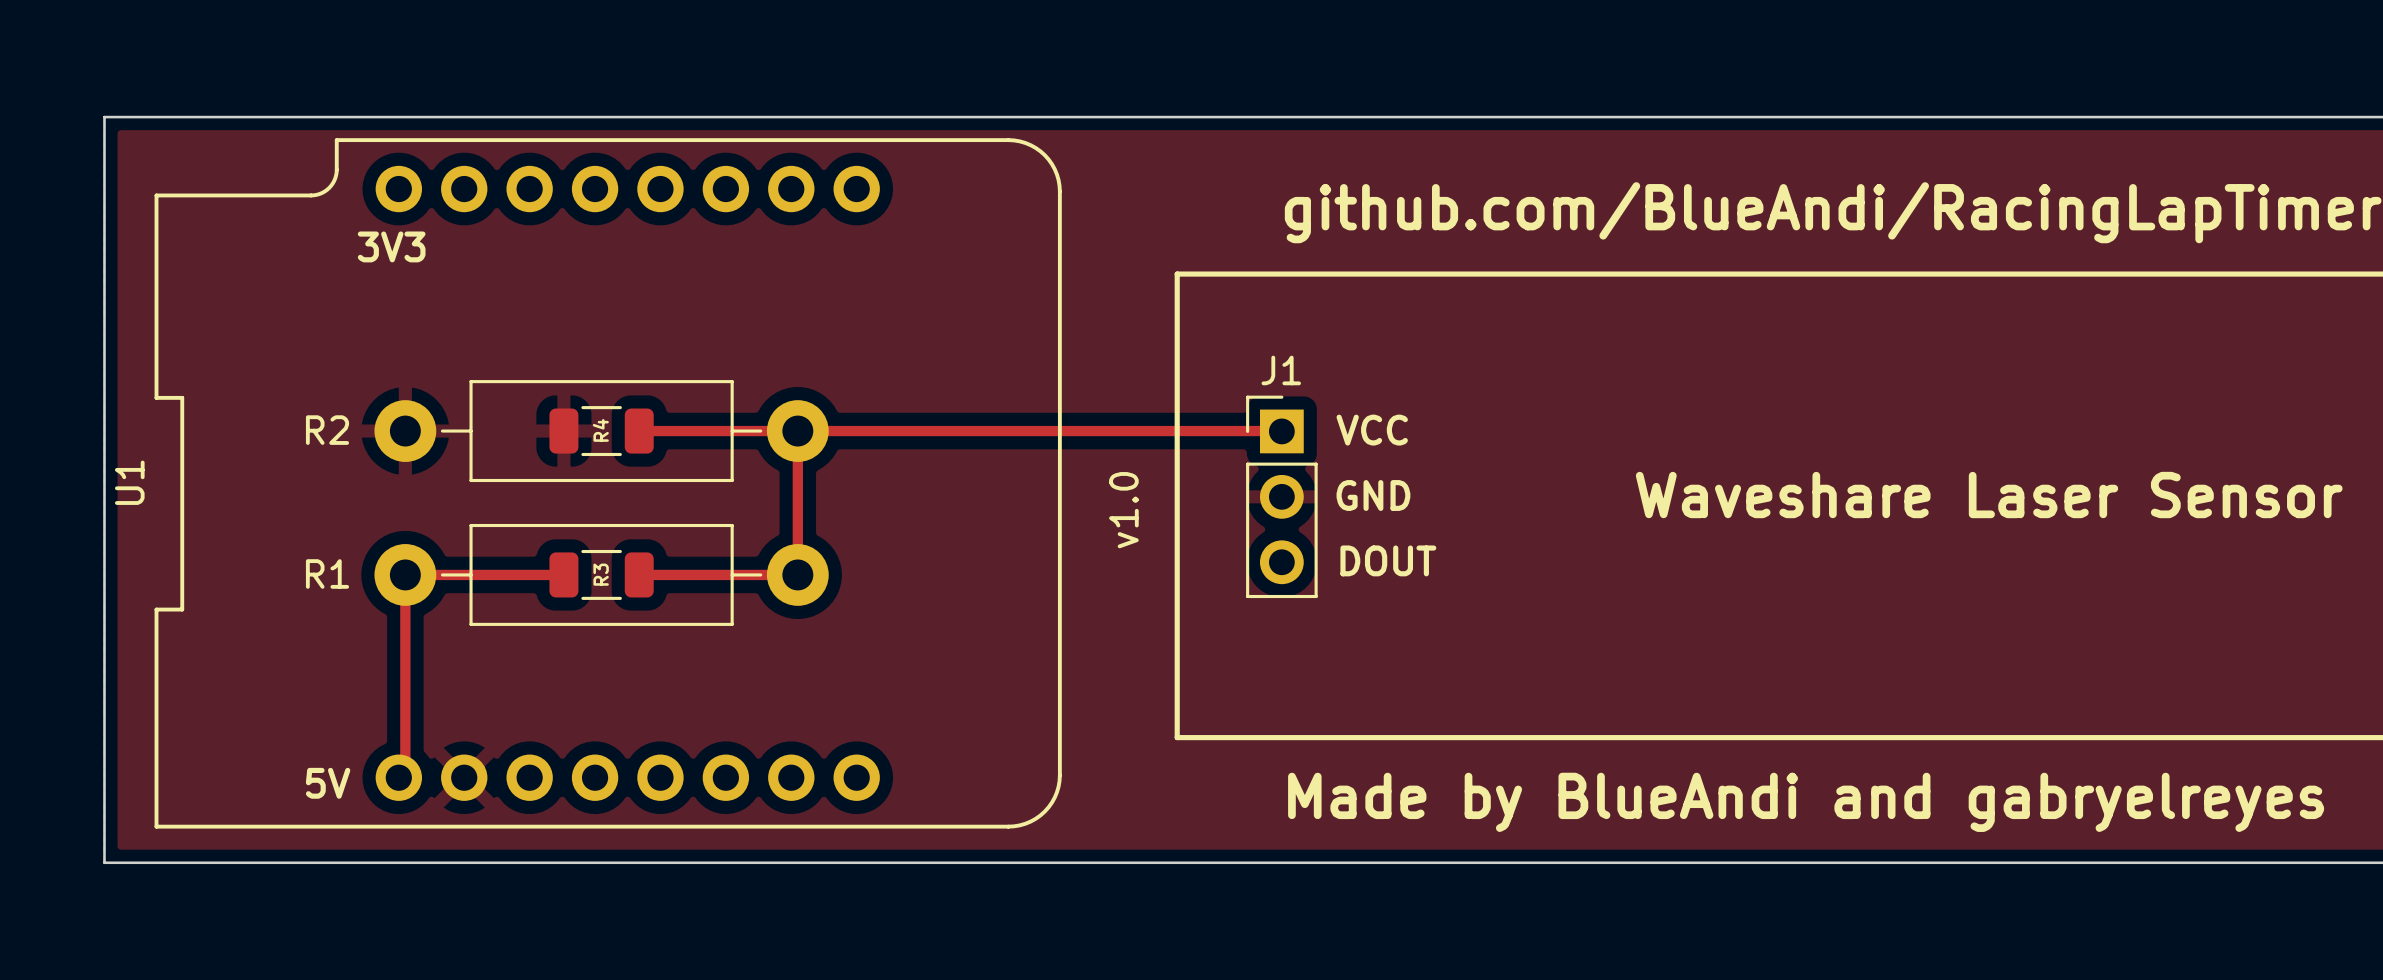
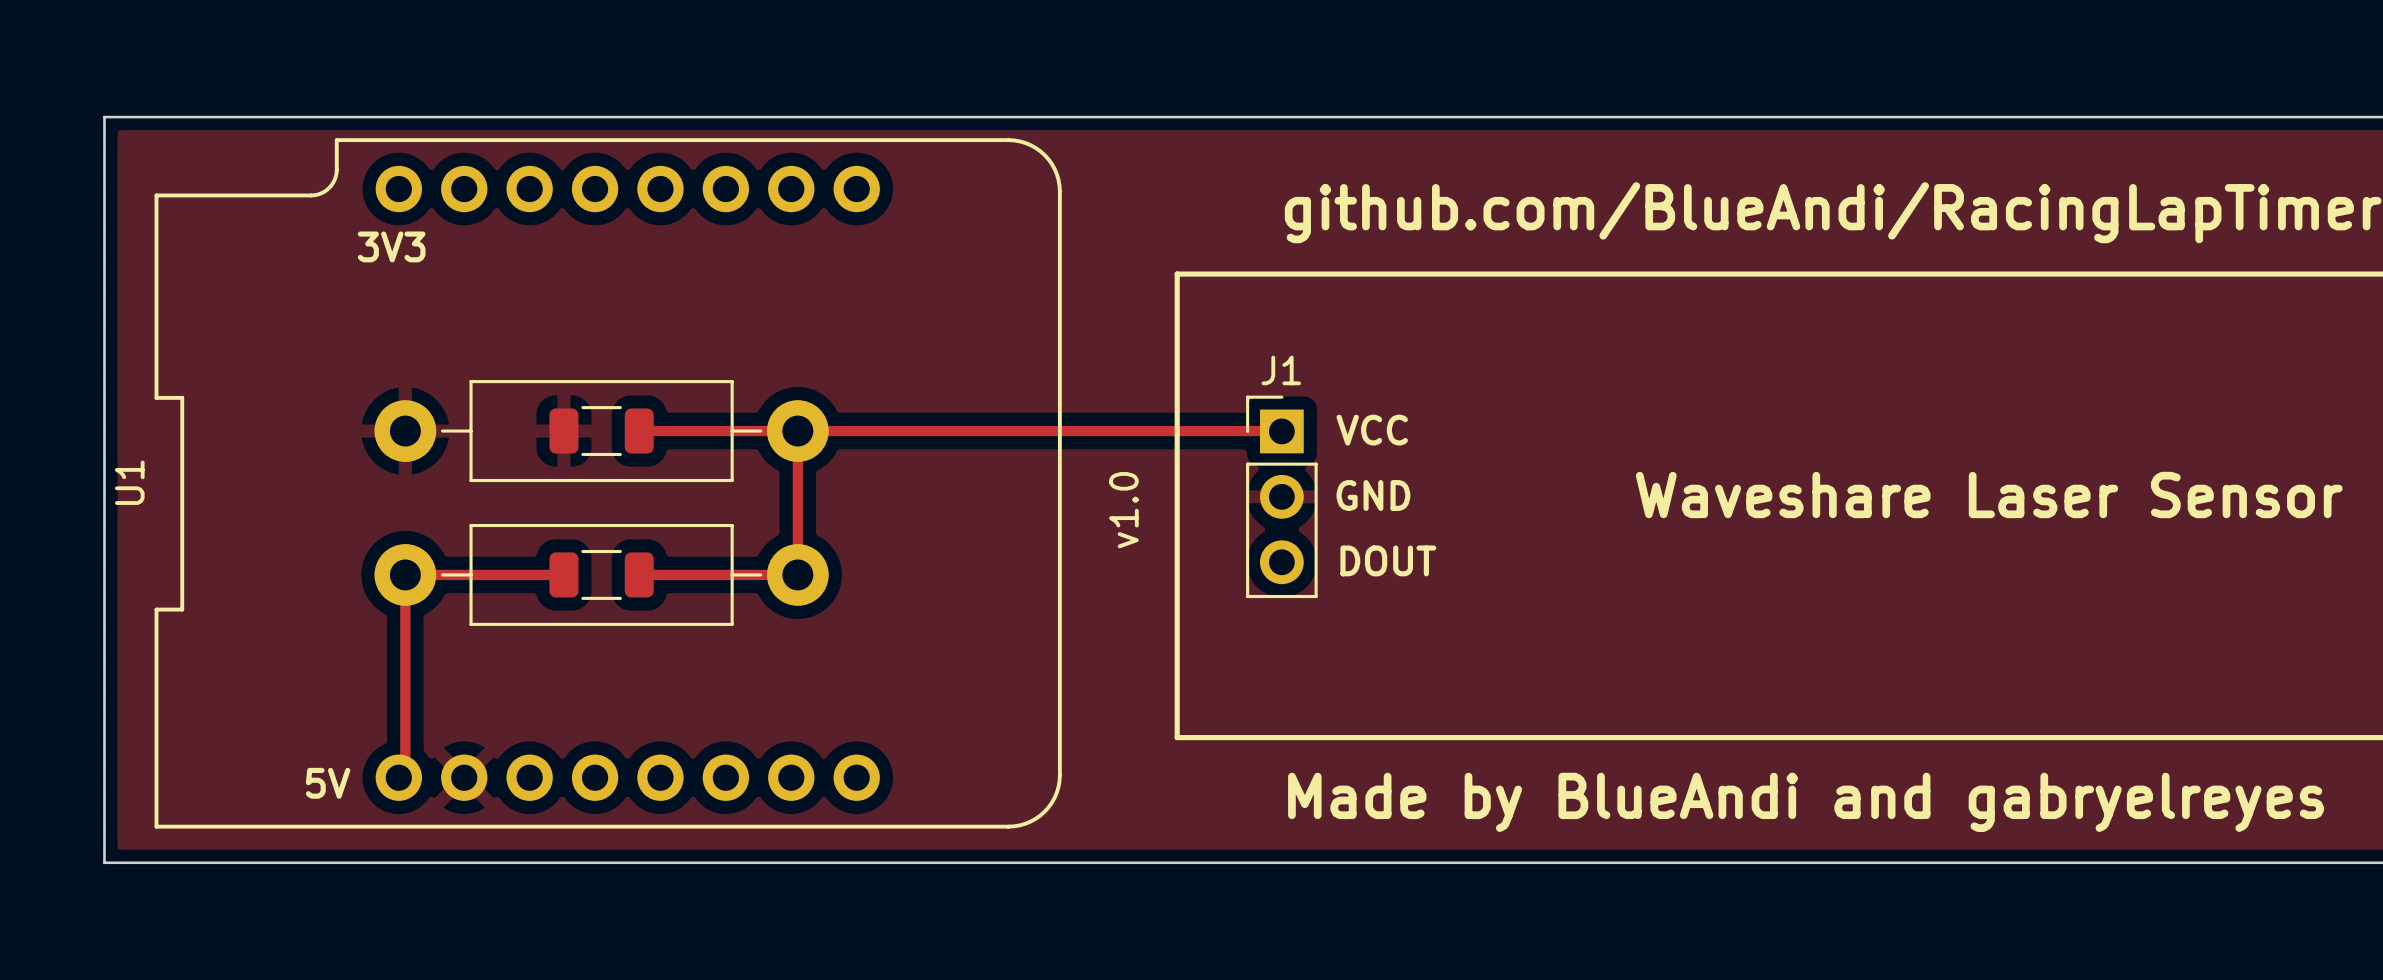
R2 name: R2 (327, 430) -> none
R4 name: R4 (600, 430) -> none
R1 name: R1 (327, 573) -> none
R3 name: R3 (601, 574) -> none

